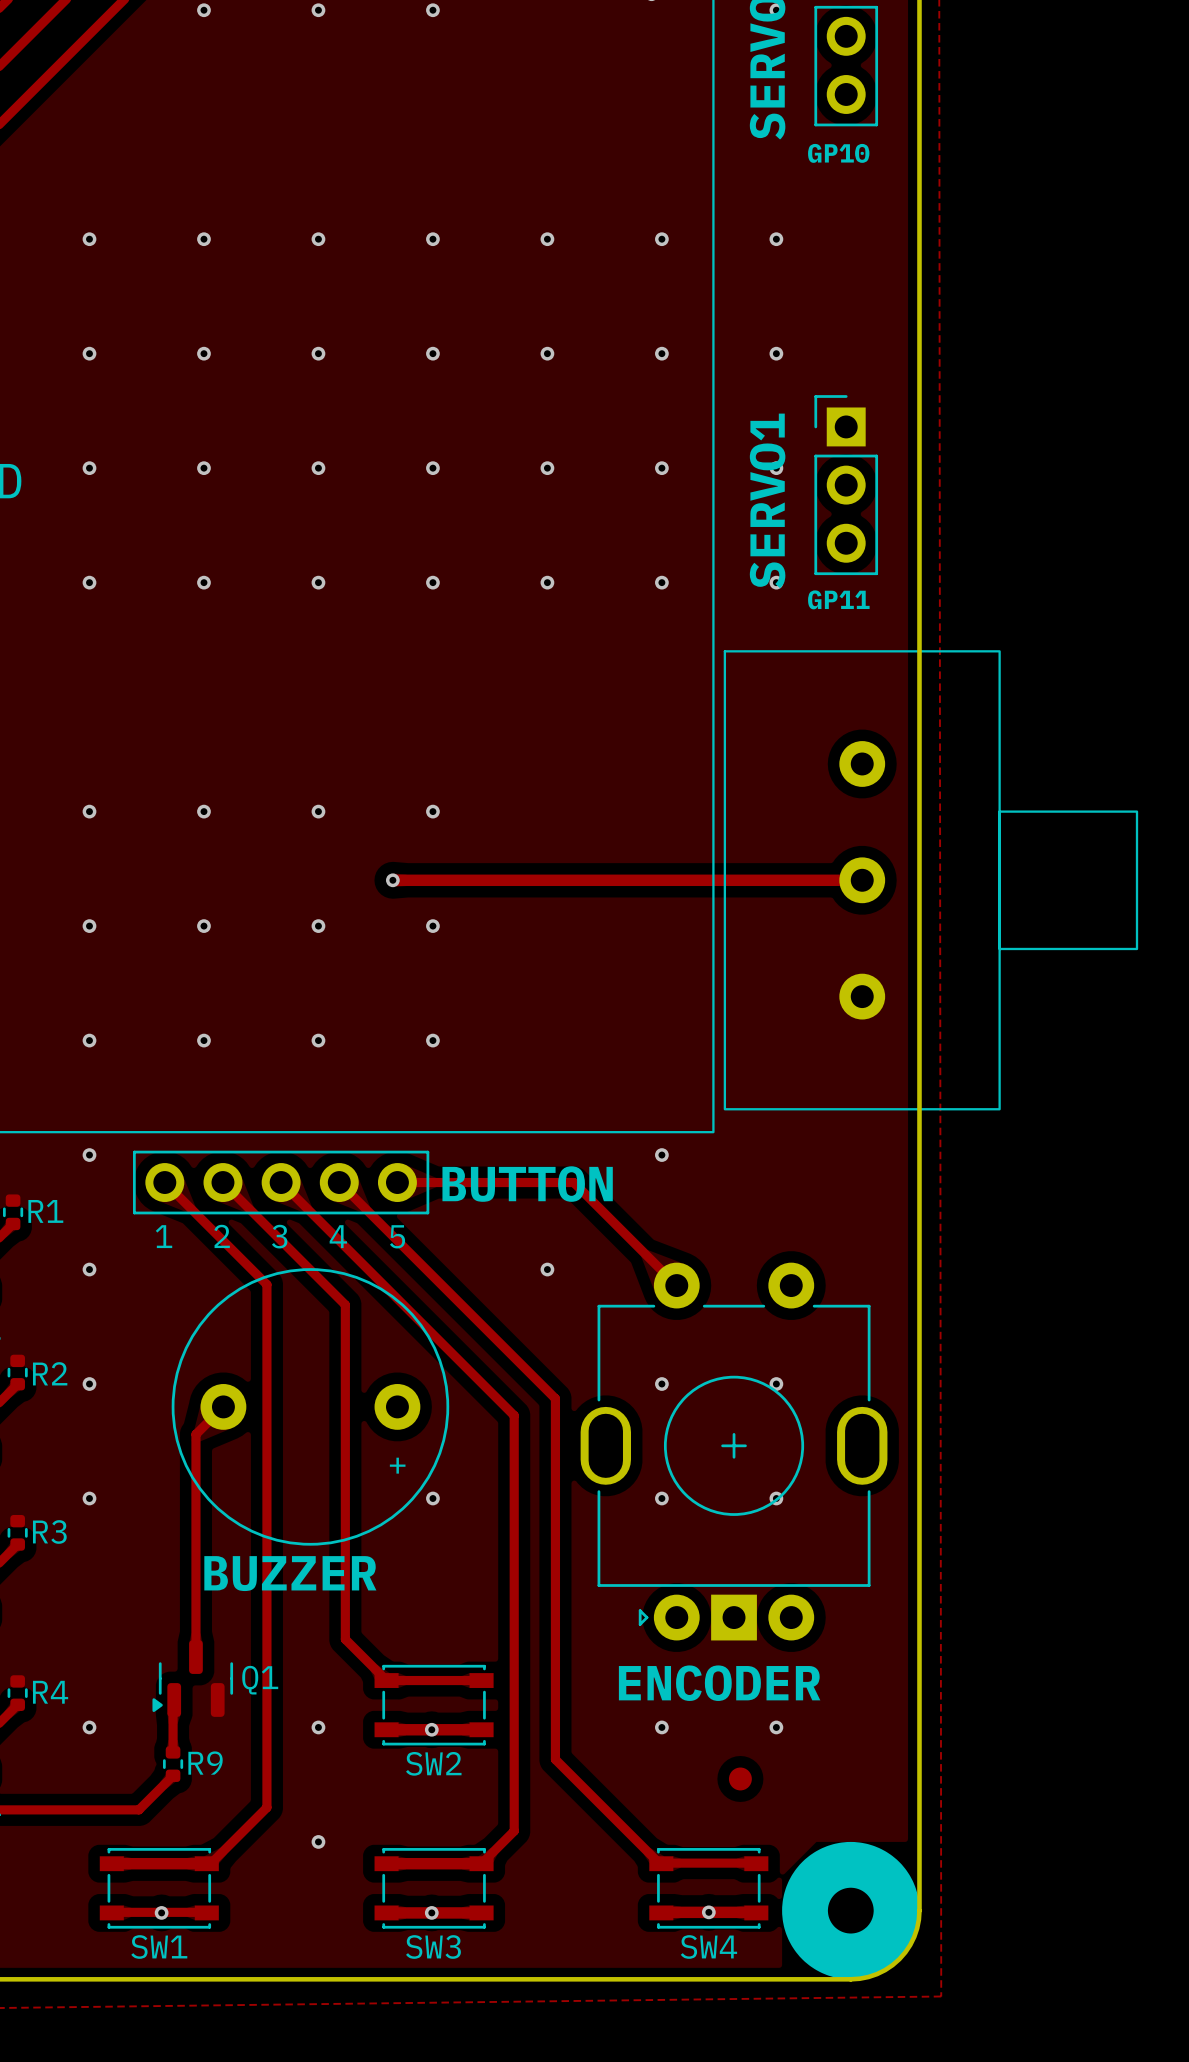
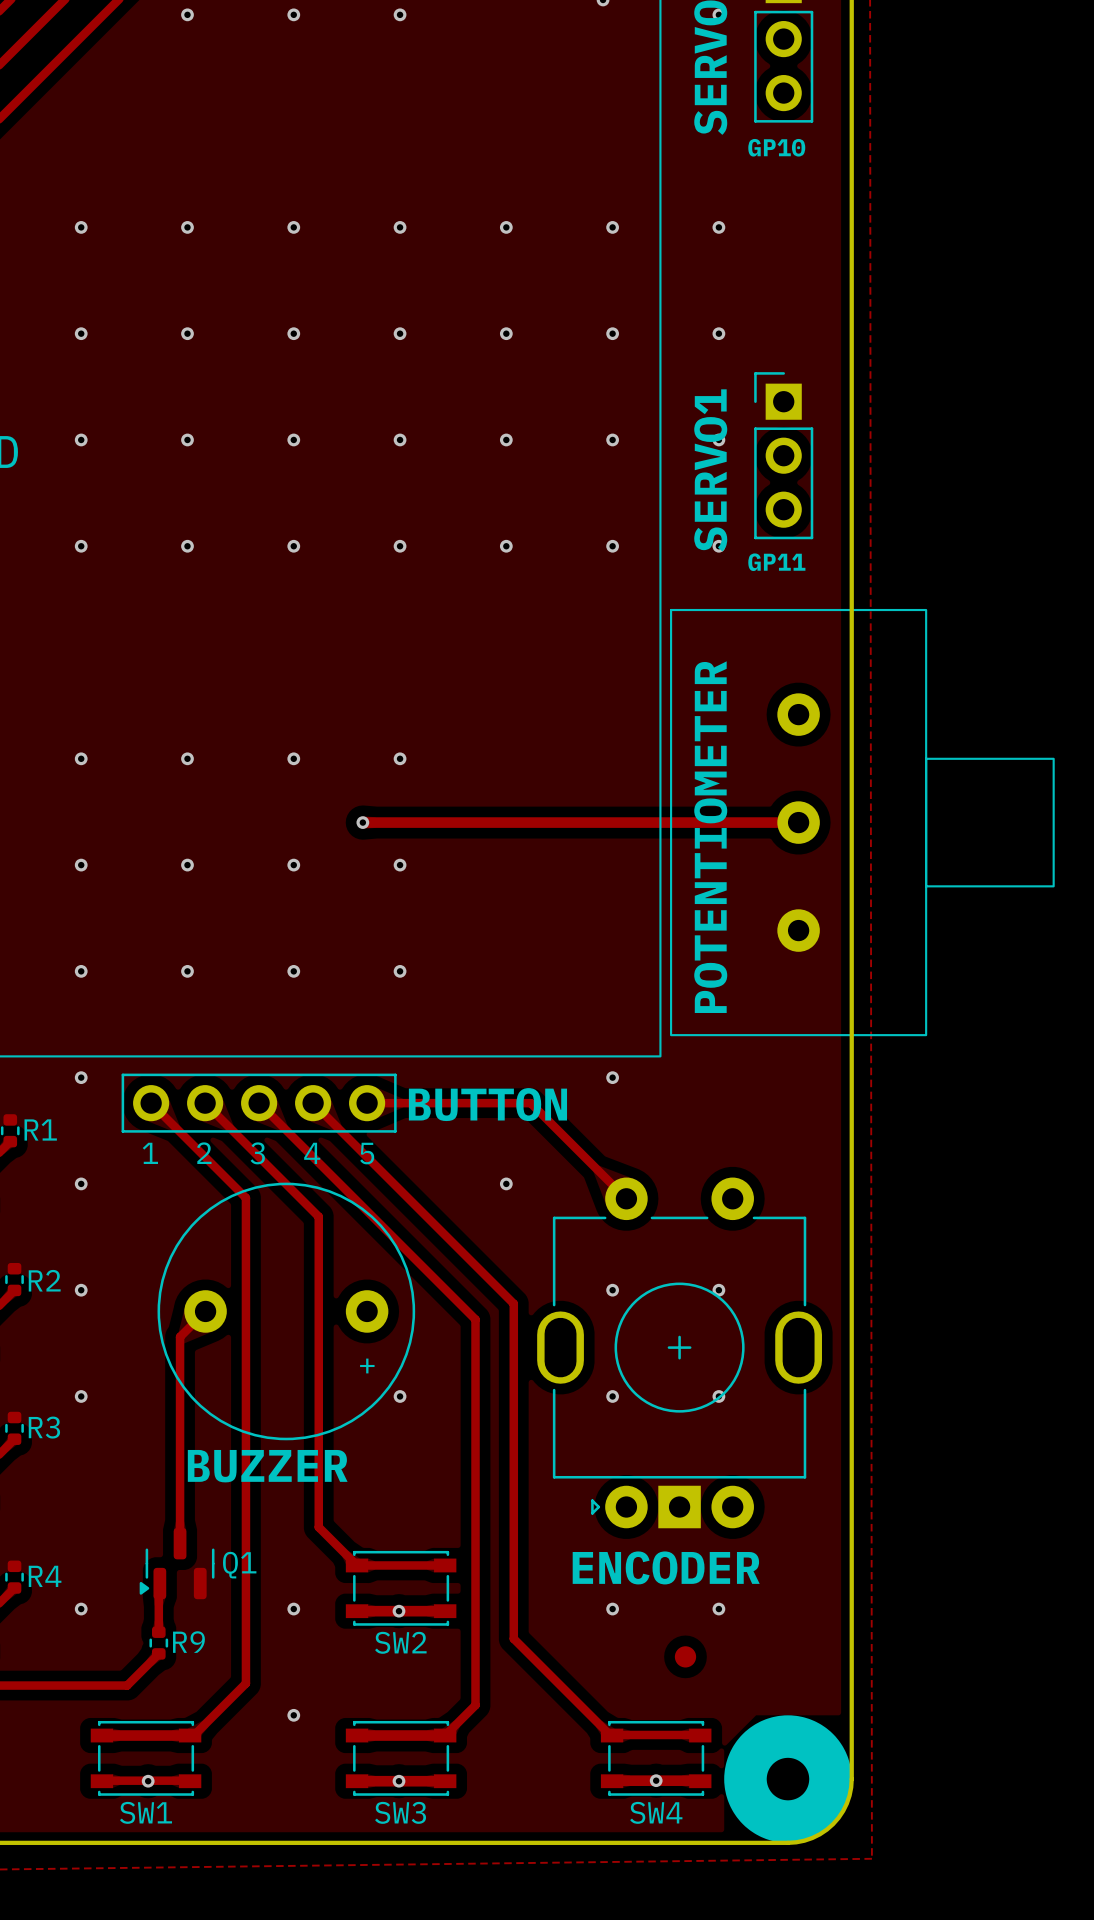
text: none -> POTENTIOMETER (710, 837)

